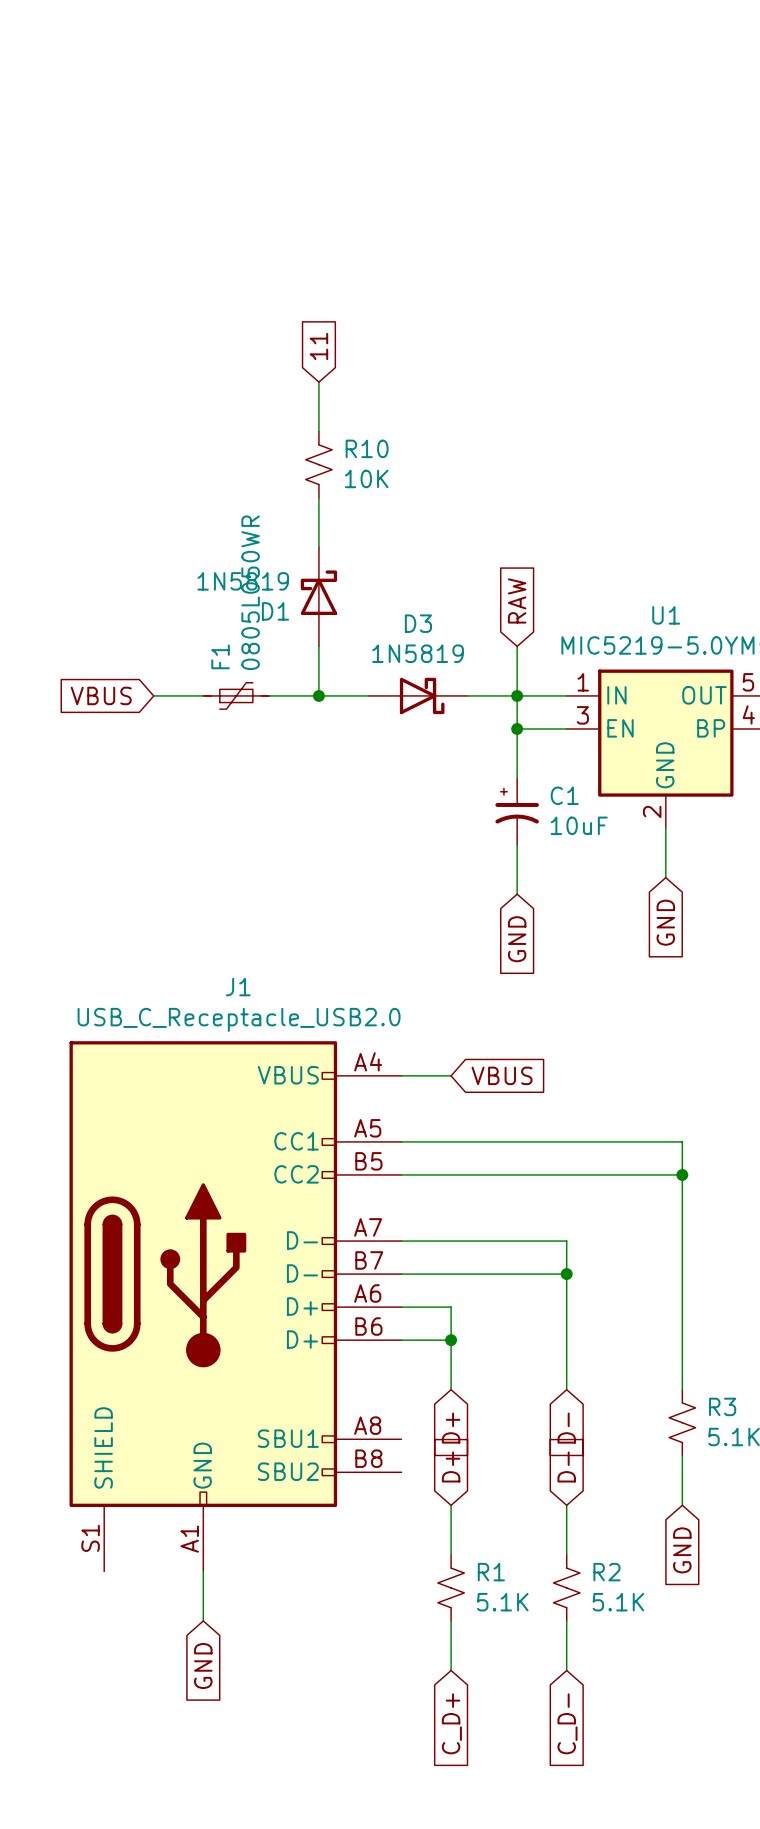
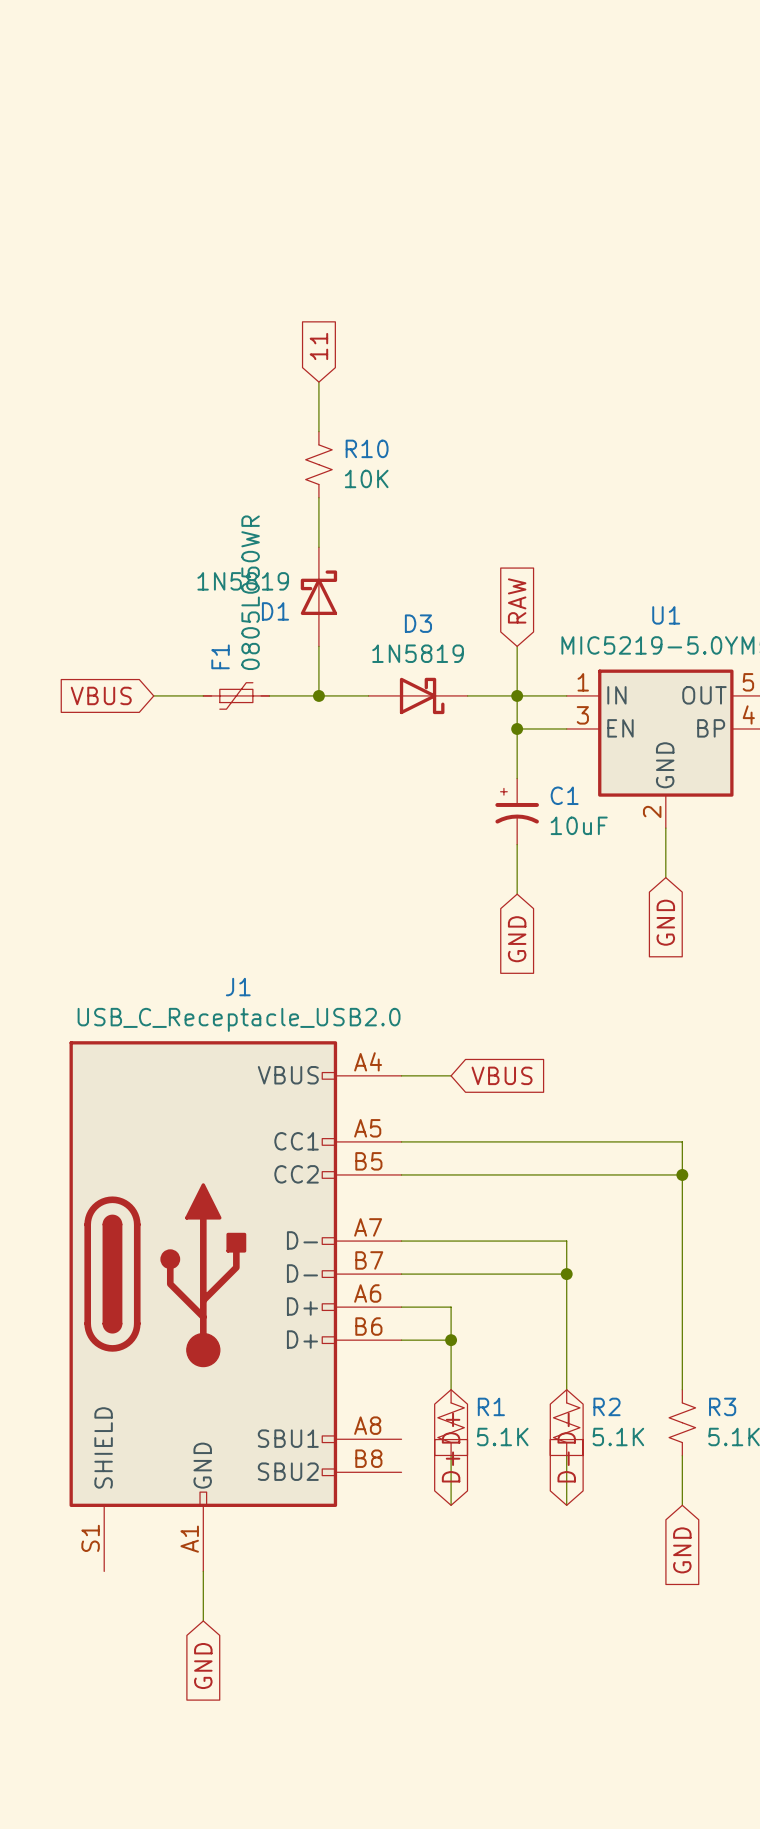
wire: (451, 1505) (451, 1554) -> (451, 1505) (451, 1455)
wire: (566, 1505) (566, 1554) -> (566, 1505) (566, 1455)
R1 position: (451, 1587) -> (451, 1422)
R2 position: (566, 1587) -> (566, 1422)
wire: (451, 1620) (451, 1670) -> none
wire: (566, 1620) (566, 1670) -> none
global label: C_D+ (451, 1723) -> none
global label: C_D- (567, 1723) -> none

